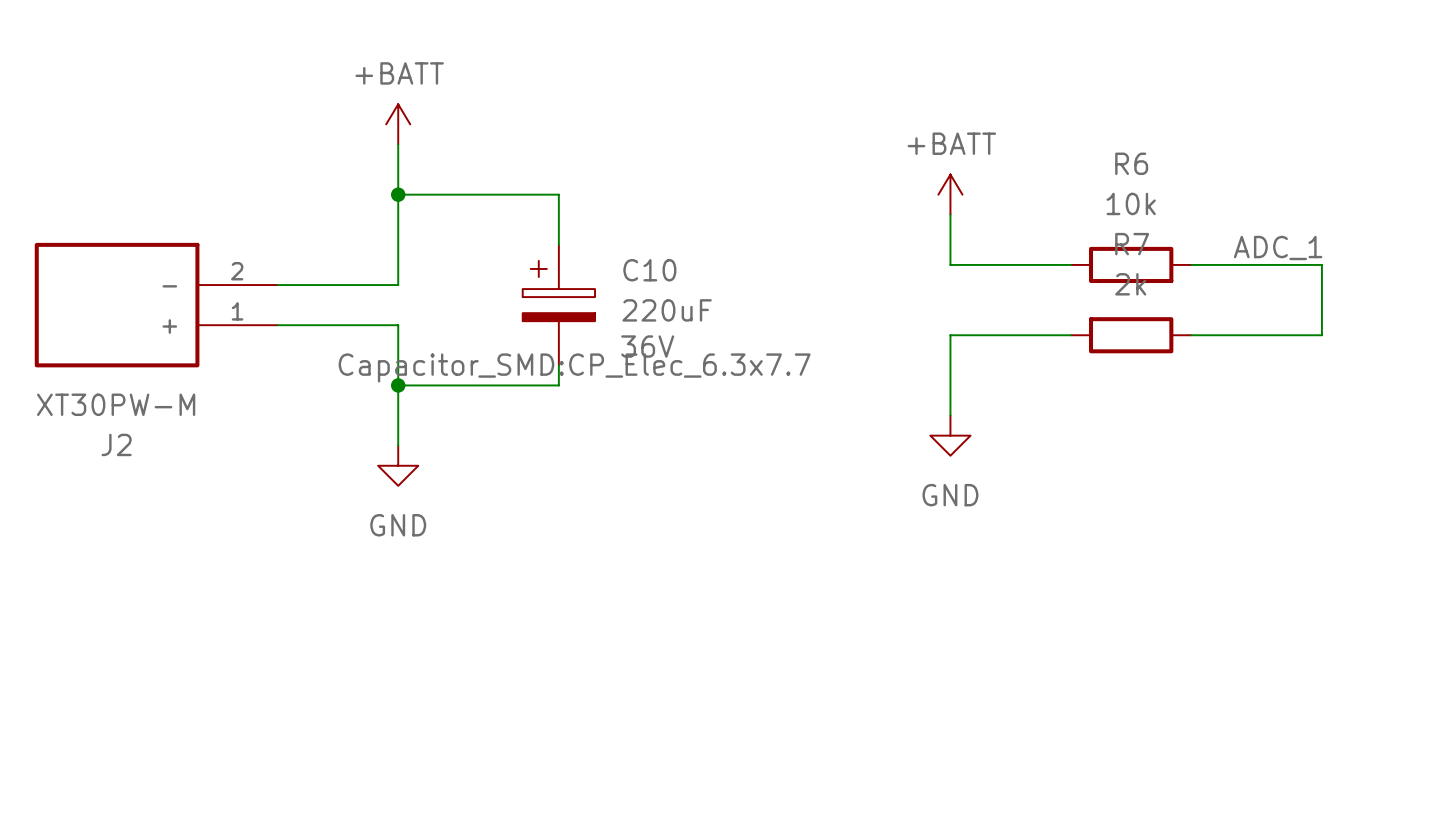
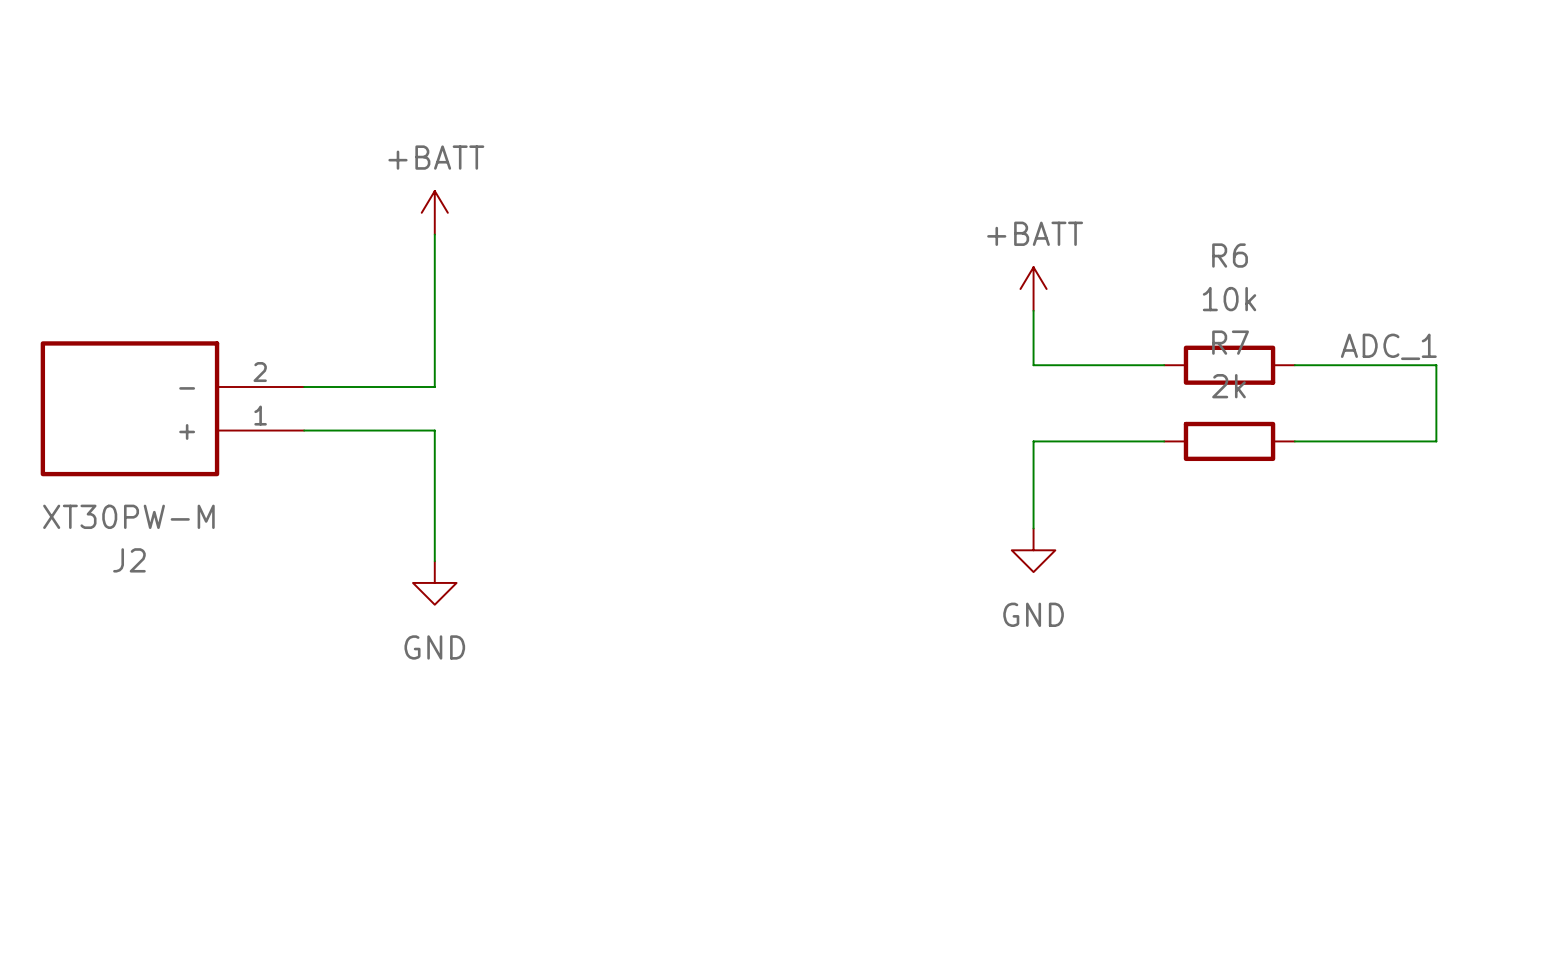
wire: (398, 194) (558, 194) (558, 244) -> none
junction: (398, 194) -> none
C10: 220uF (558, 305) -> none
wire: (558, 365) (558, 385) (398, 385) -> none
junction: (398, 385) -> none

